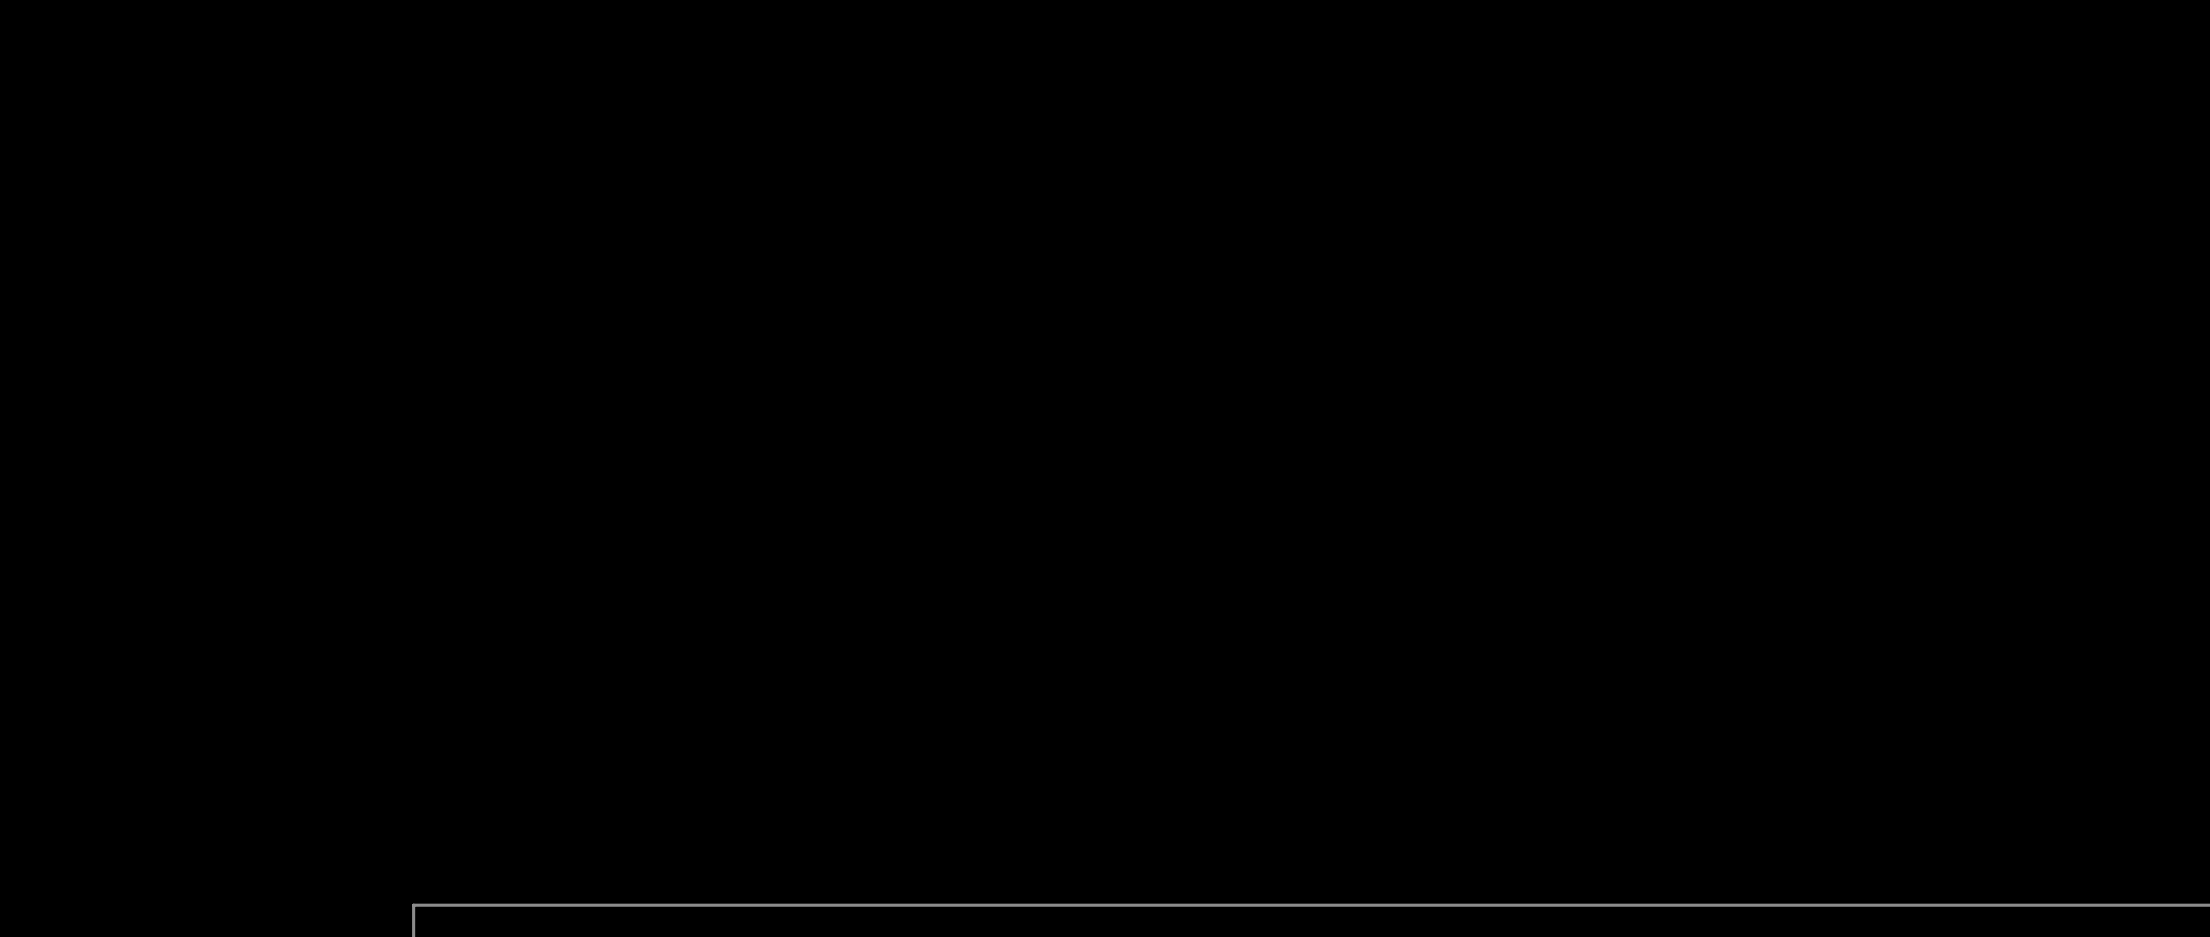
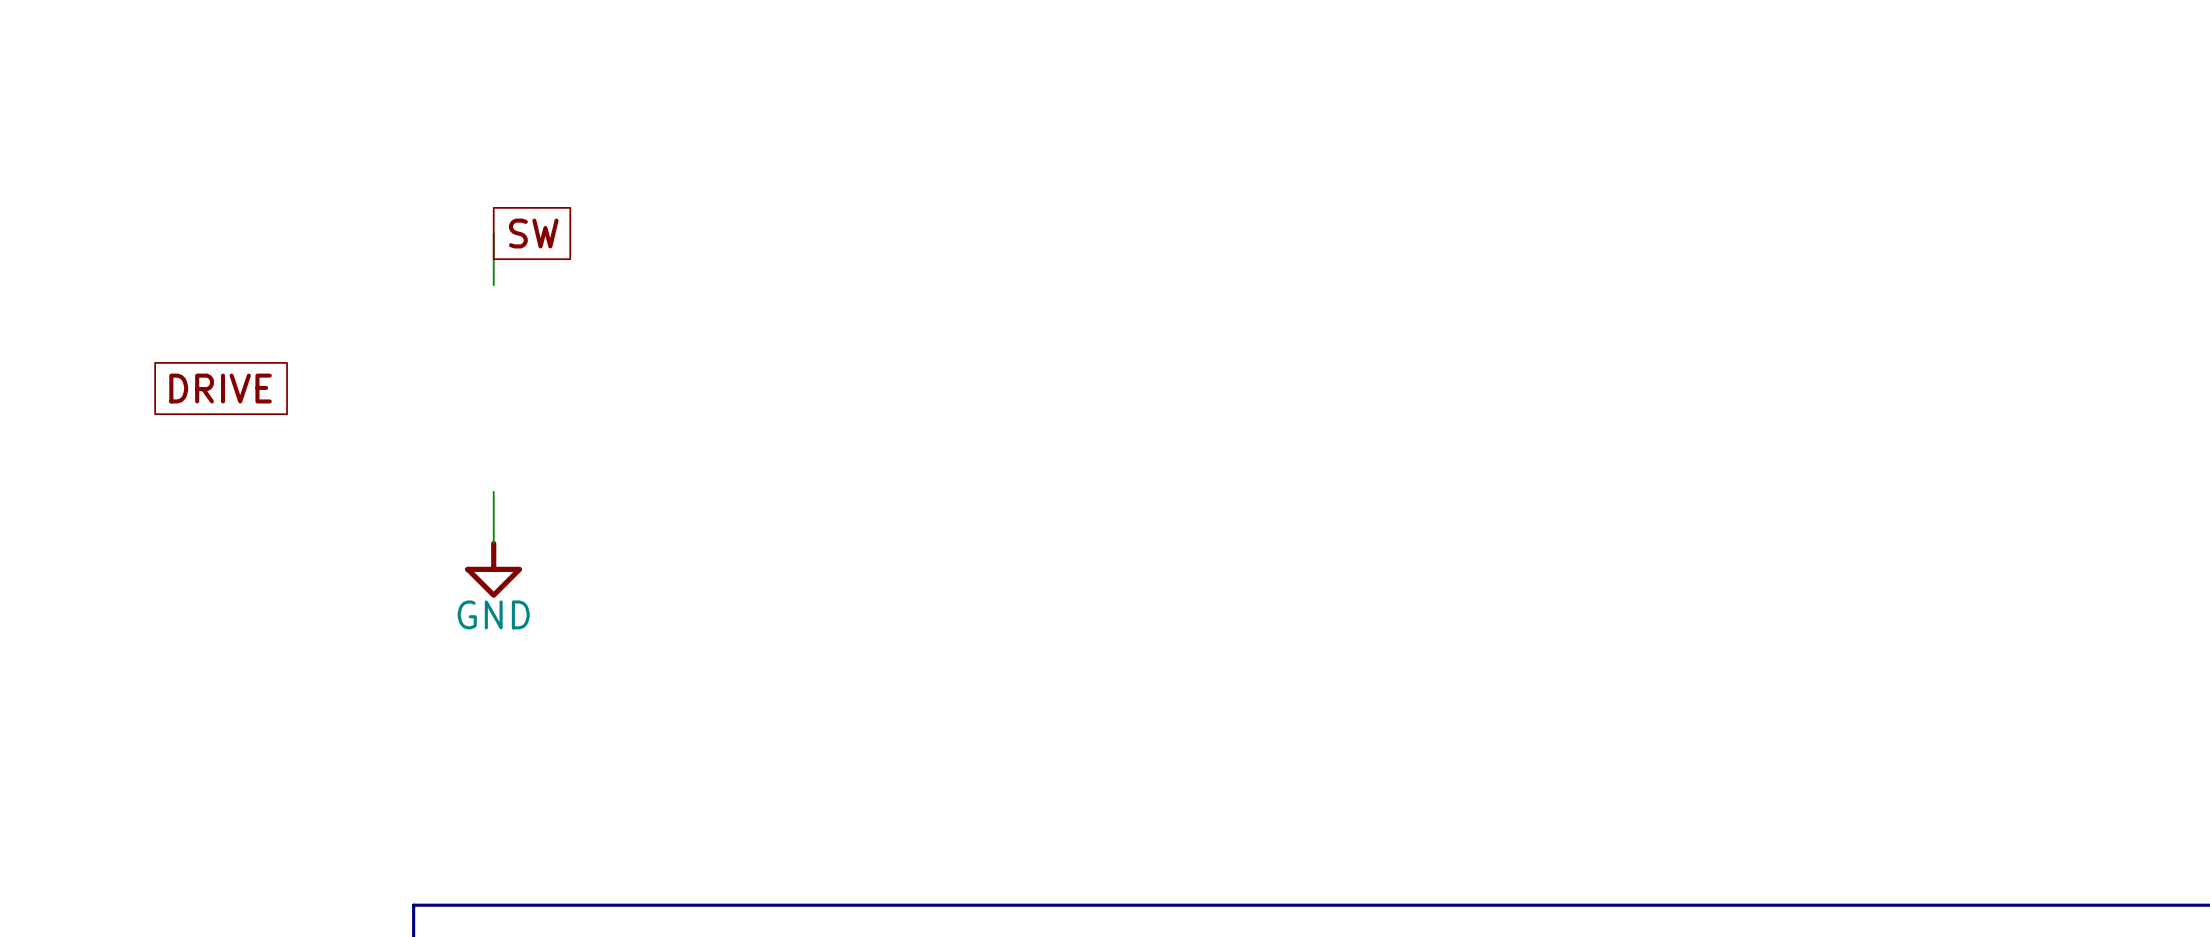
wire: none -> (493, 233) (493, 285)
global label: none -> SW (533, 233)
global label: none -> DRIVE (220, 388)
wire: none -> (493, 491) (493, 543)
power symbol: none -> GND (493, 569)

